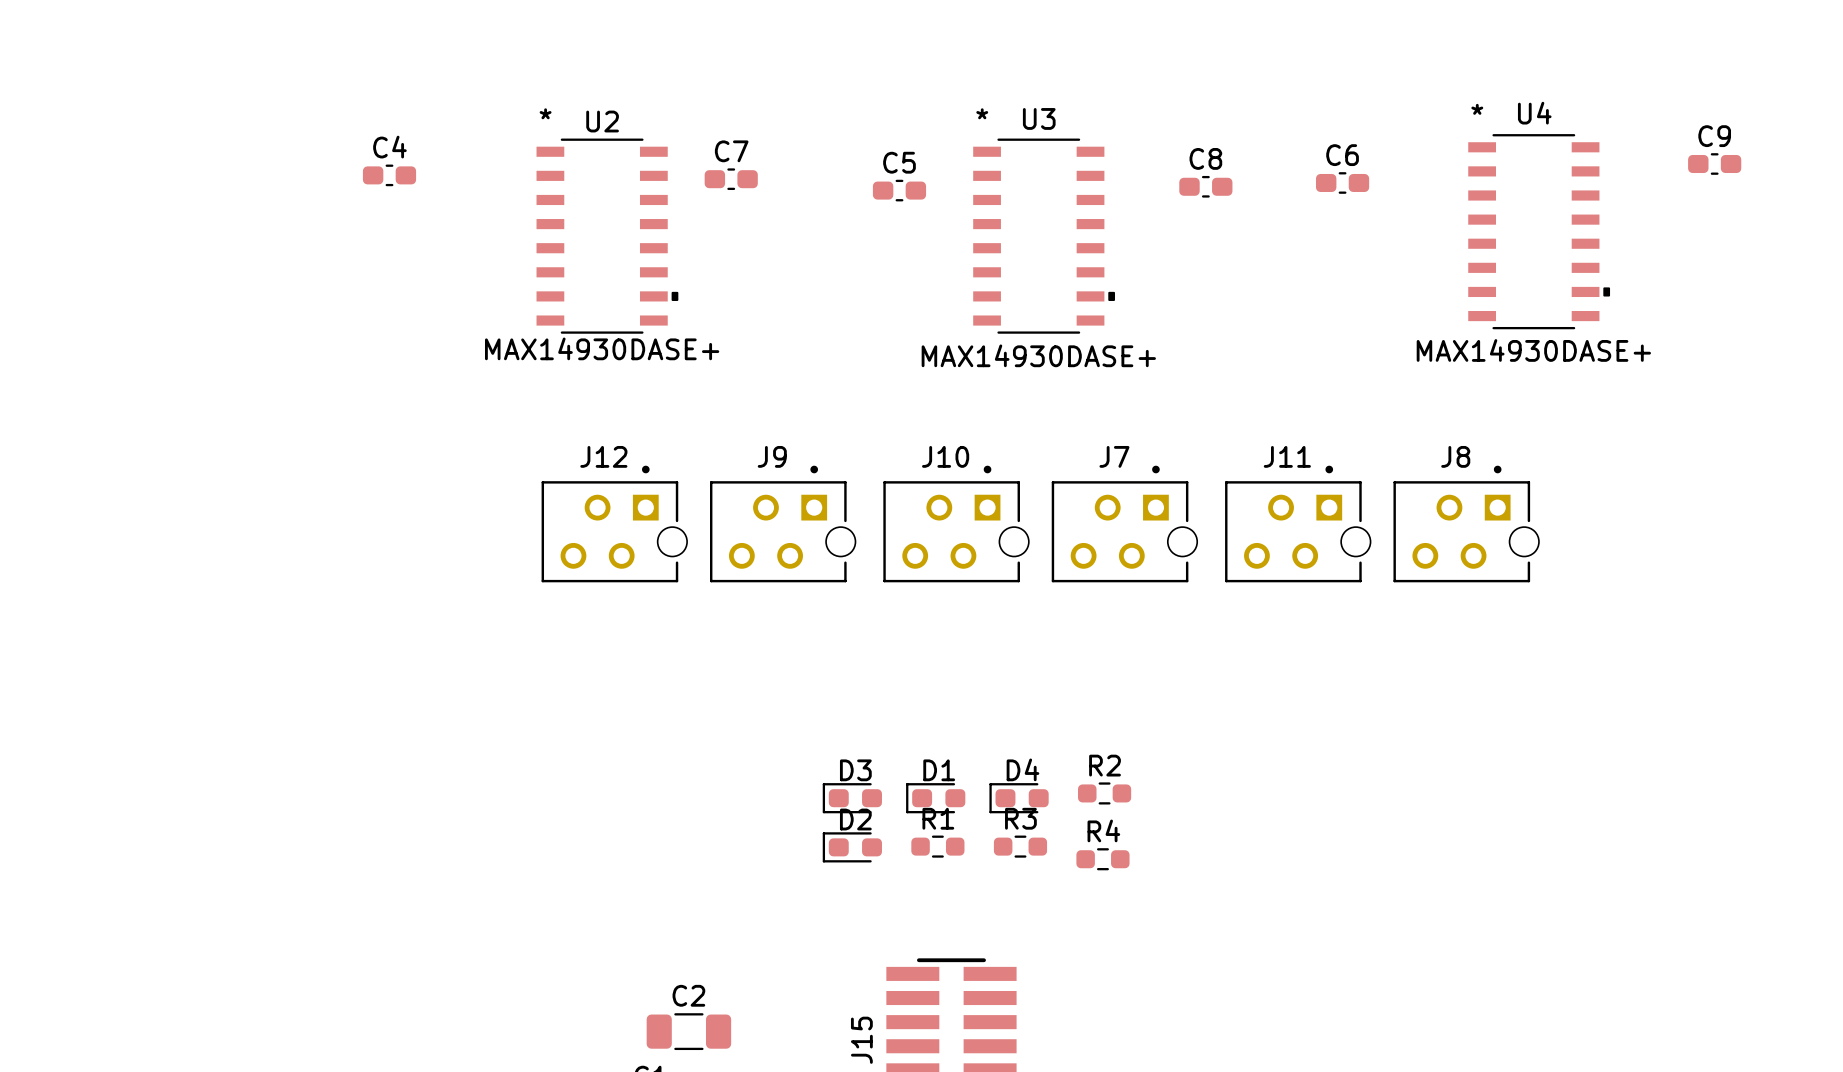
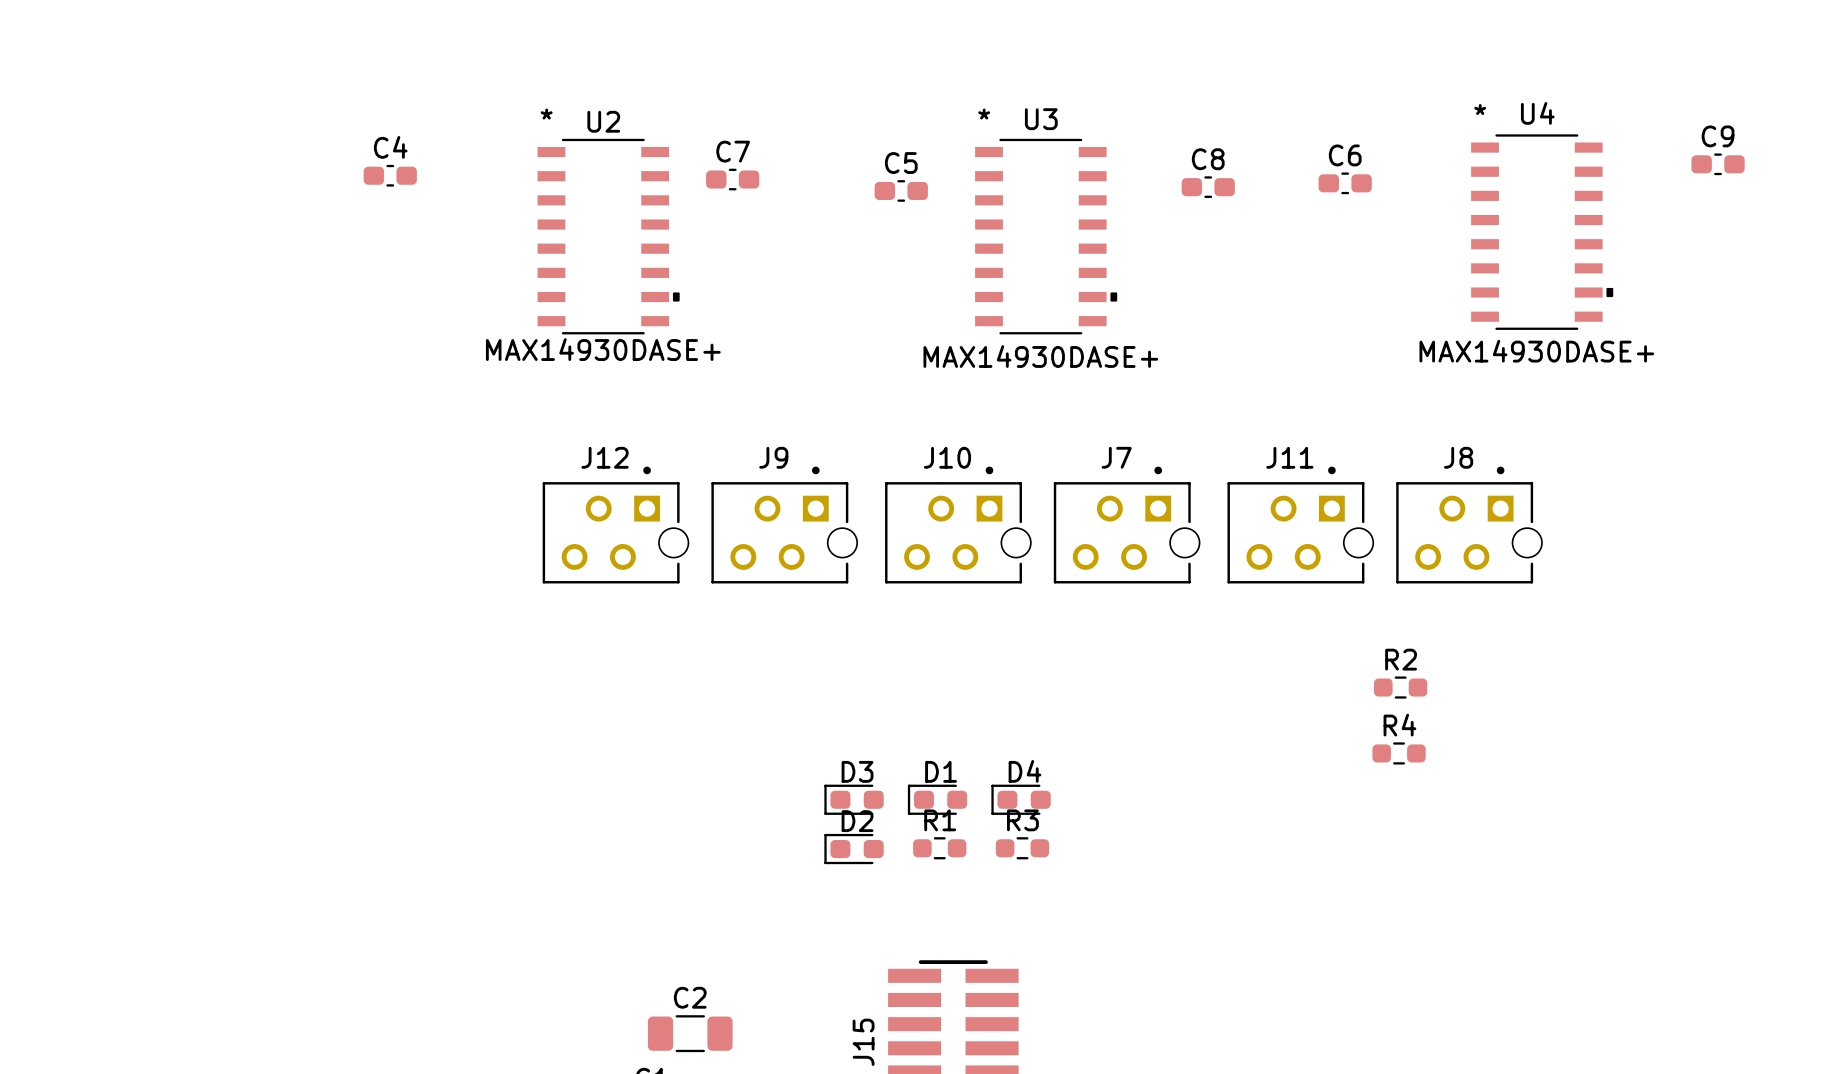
R2 position: (1104, 793) -> (1400, 687)
R4 position: (1102, 859) -> (1399, 753)

